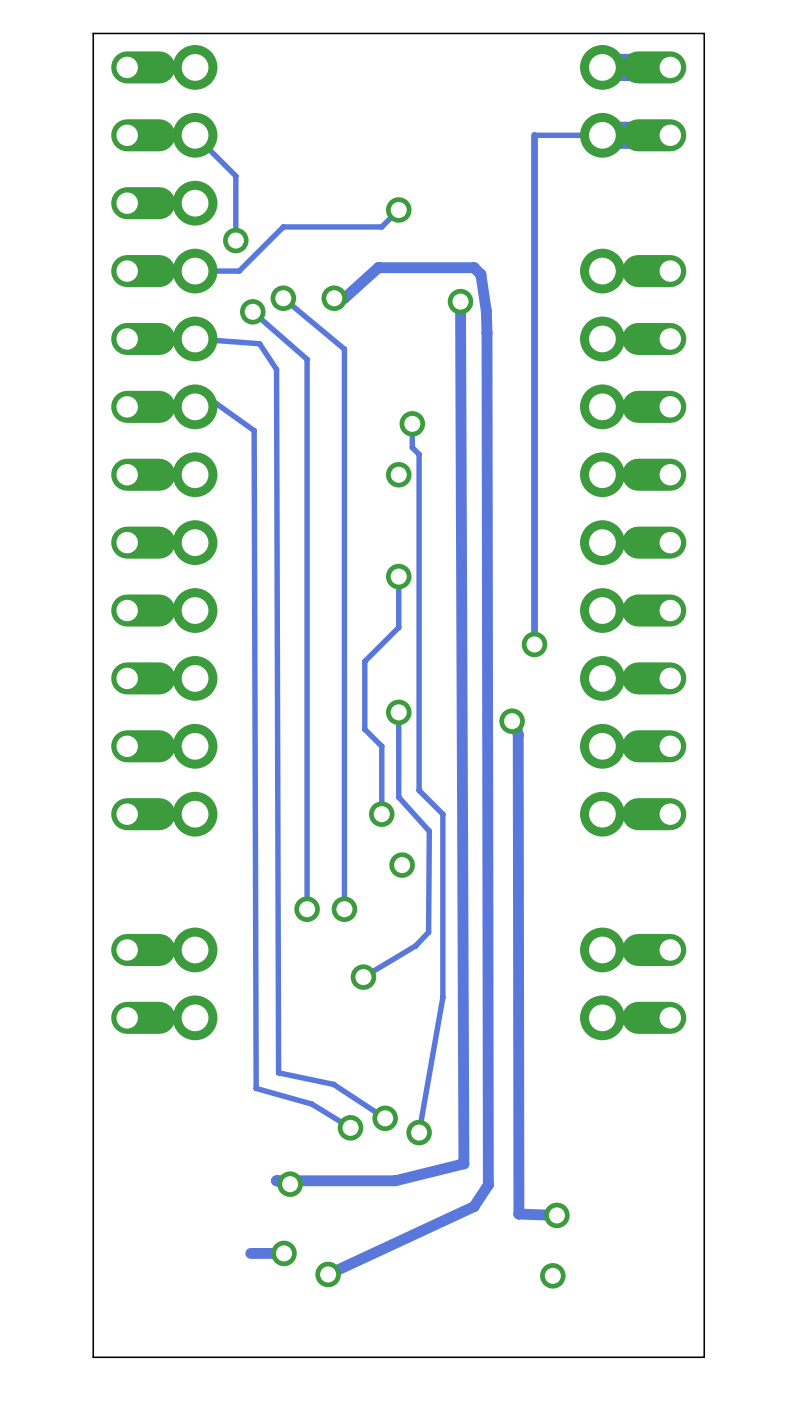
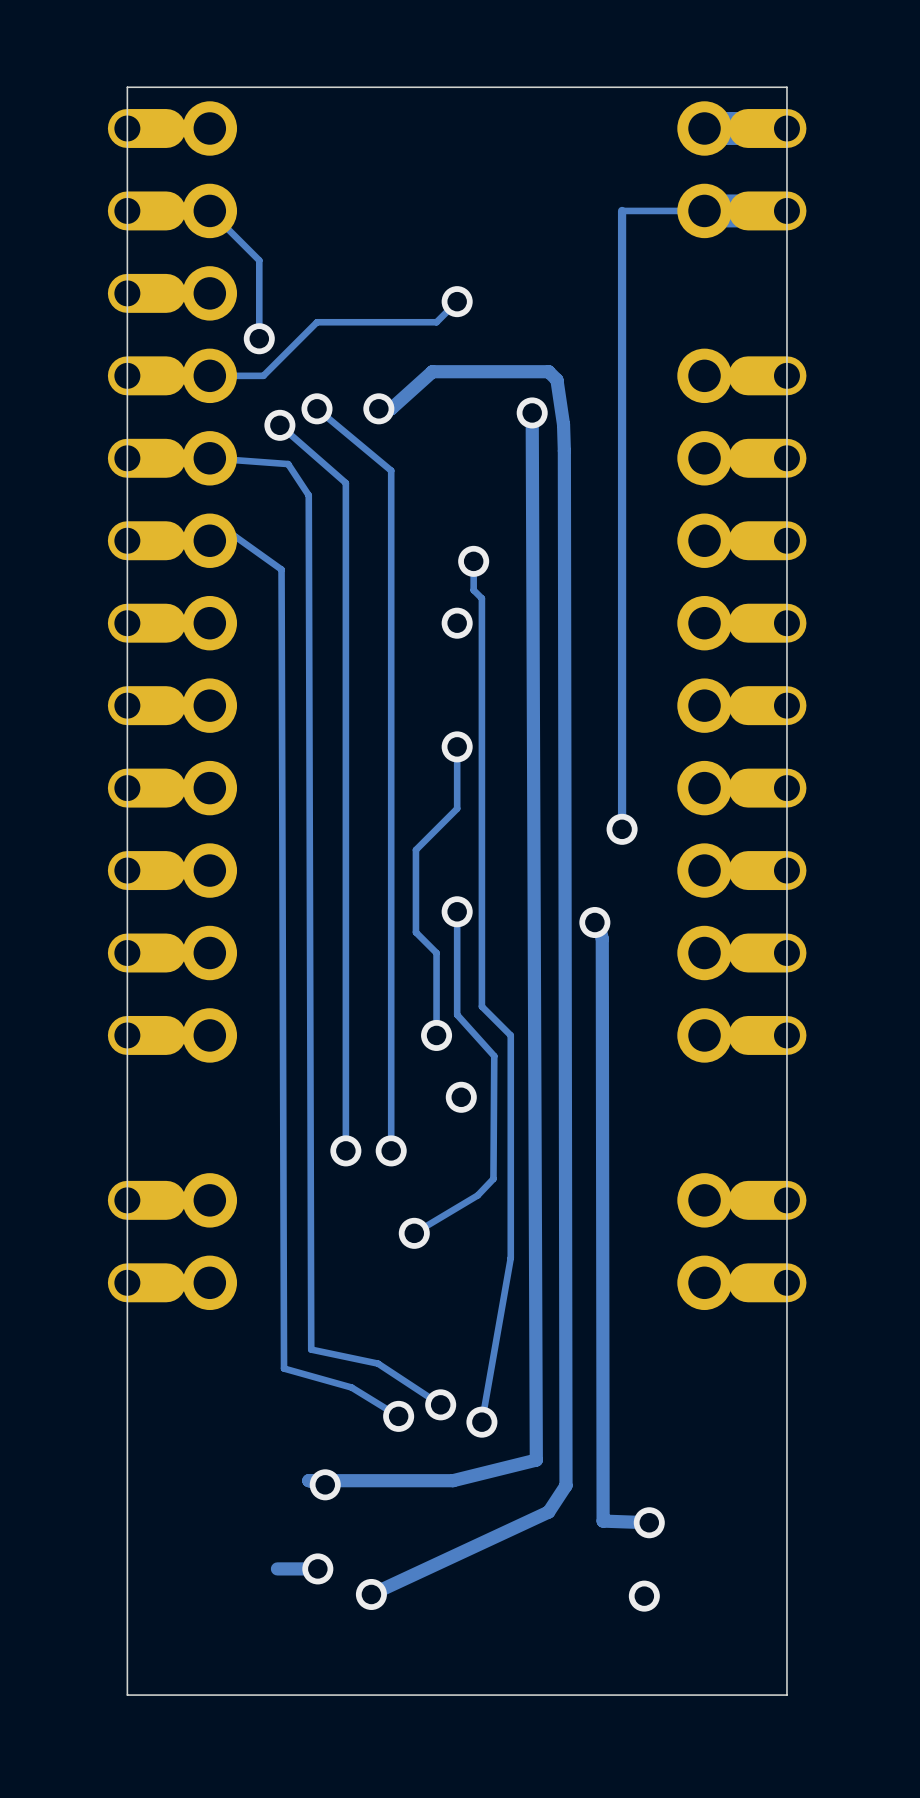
board edge: (127, 33) (93, 33) (93, 1357) (127, 1357) -> (127, 87) (127, 1695)
board edge: (670, 33) (704, 33) (704, 1357) (670, 1357) -> (786, 87) (786, 1695)

